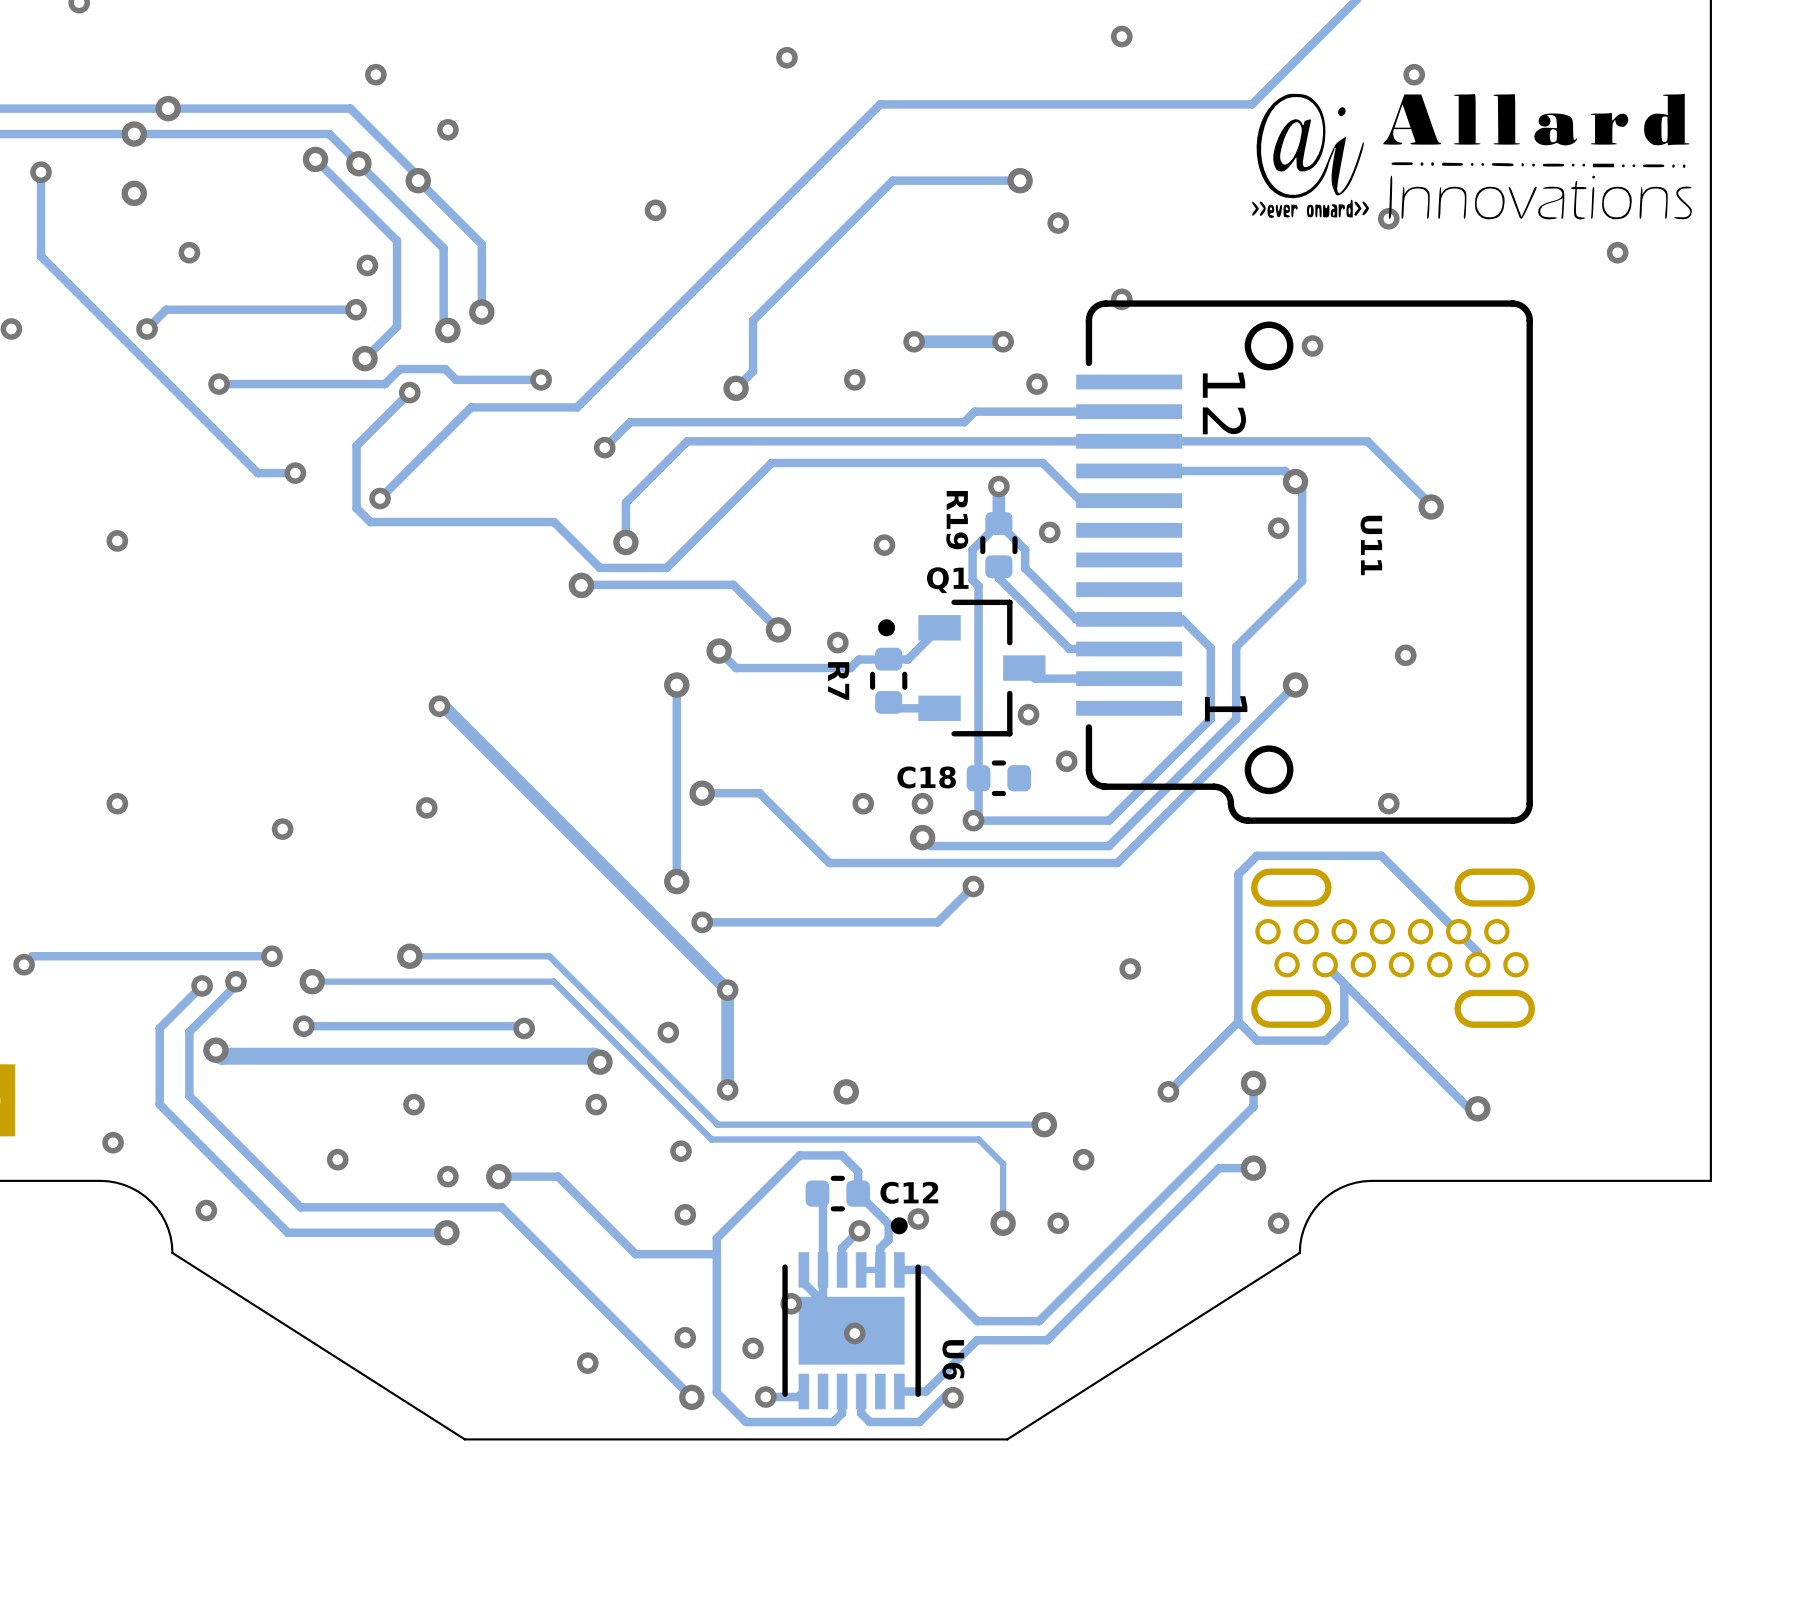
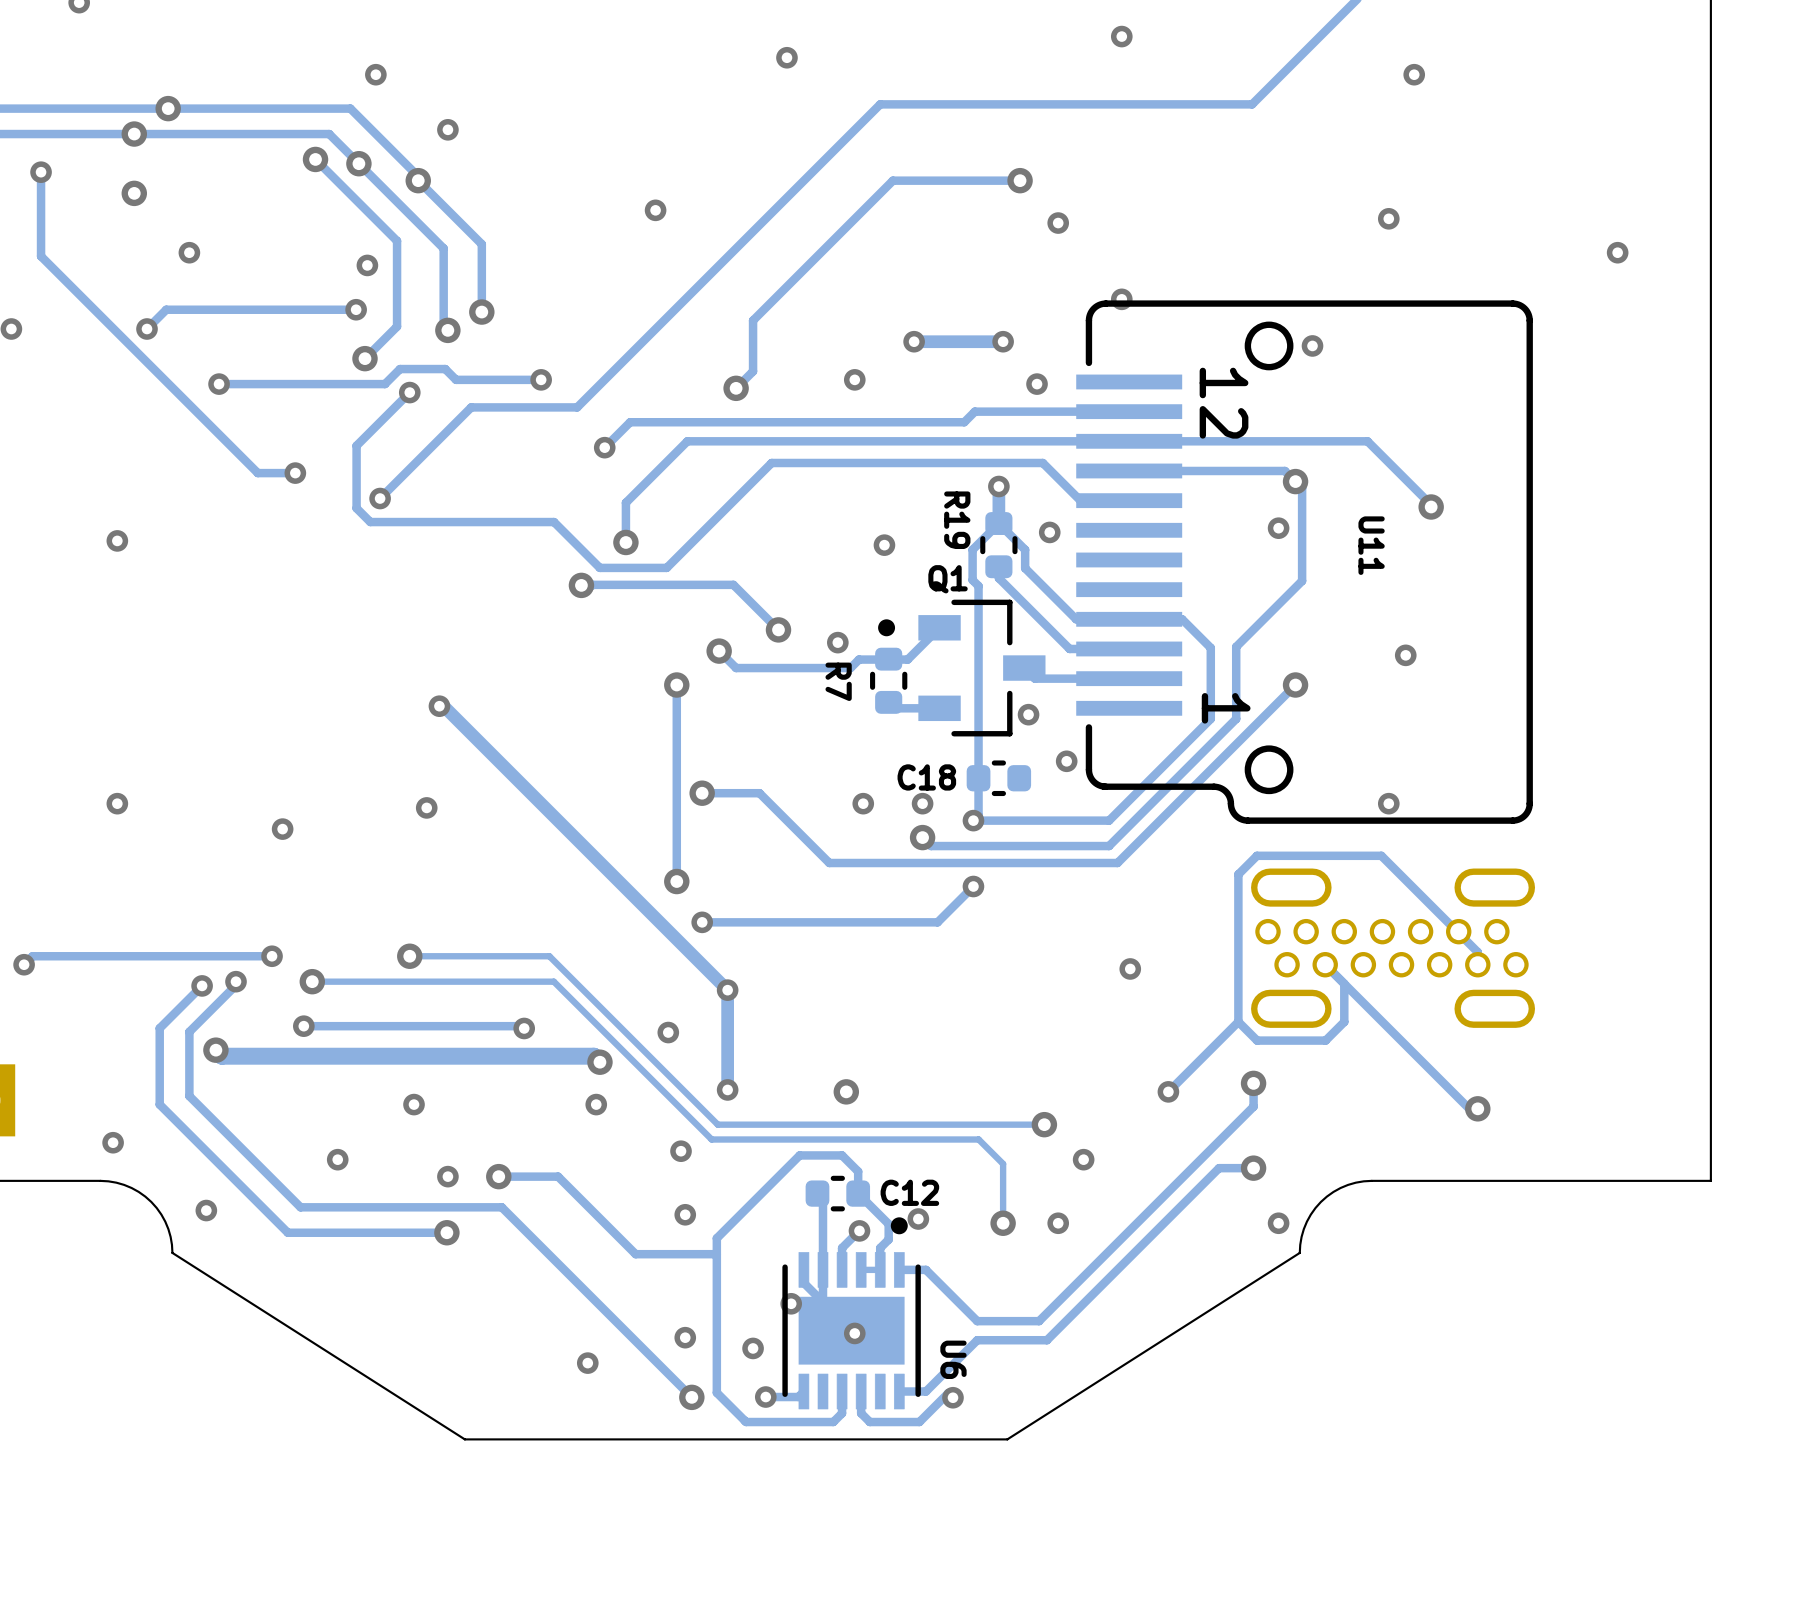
drawing: [1252, 93, 1692, 220] -> none

